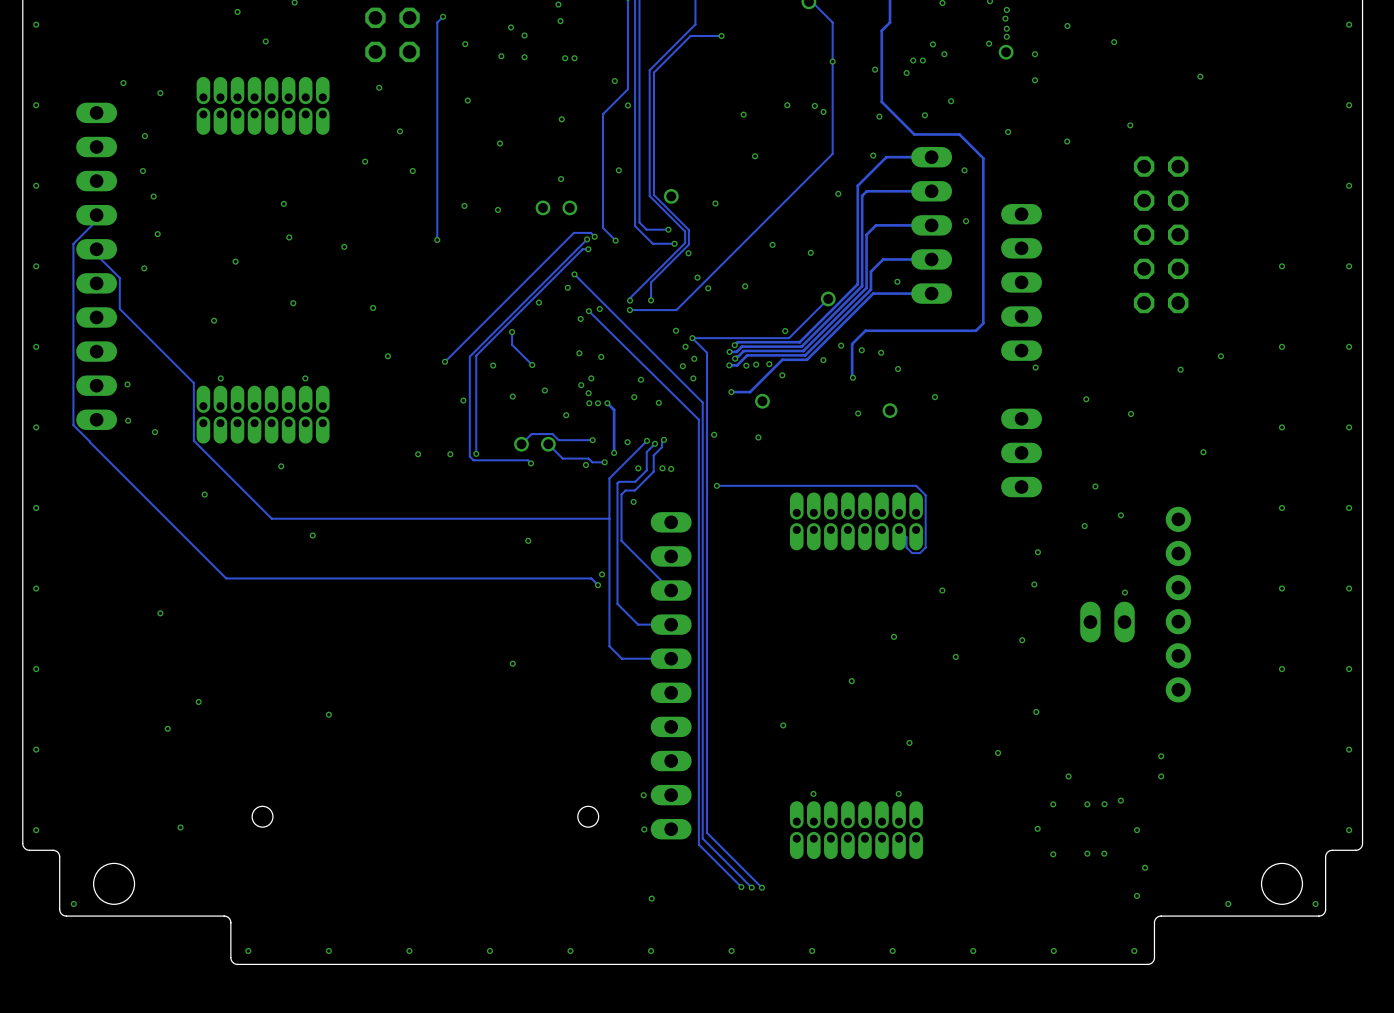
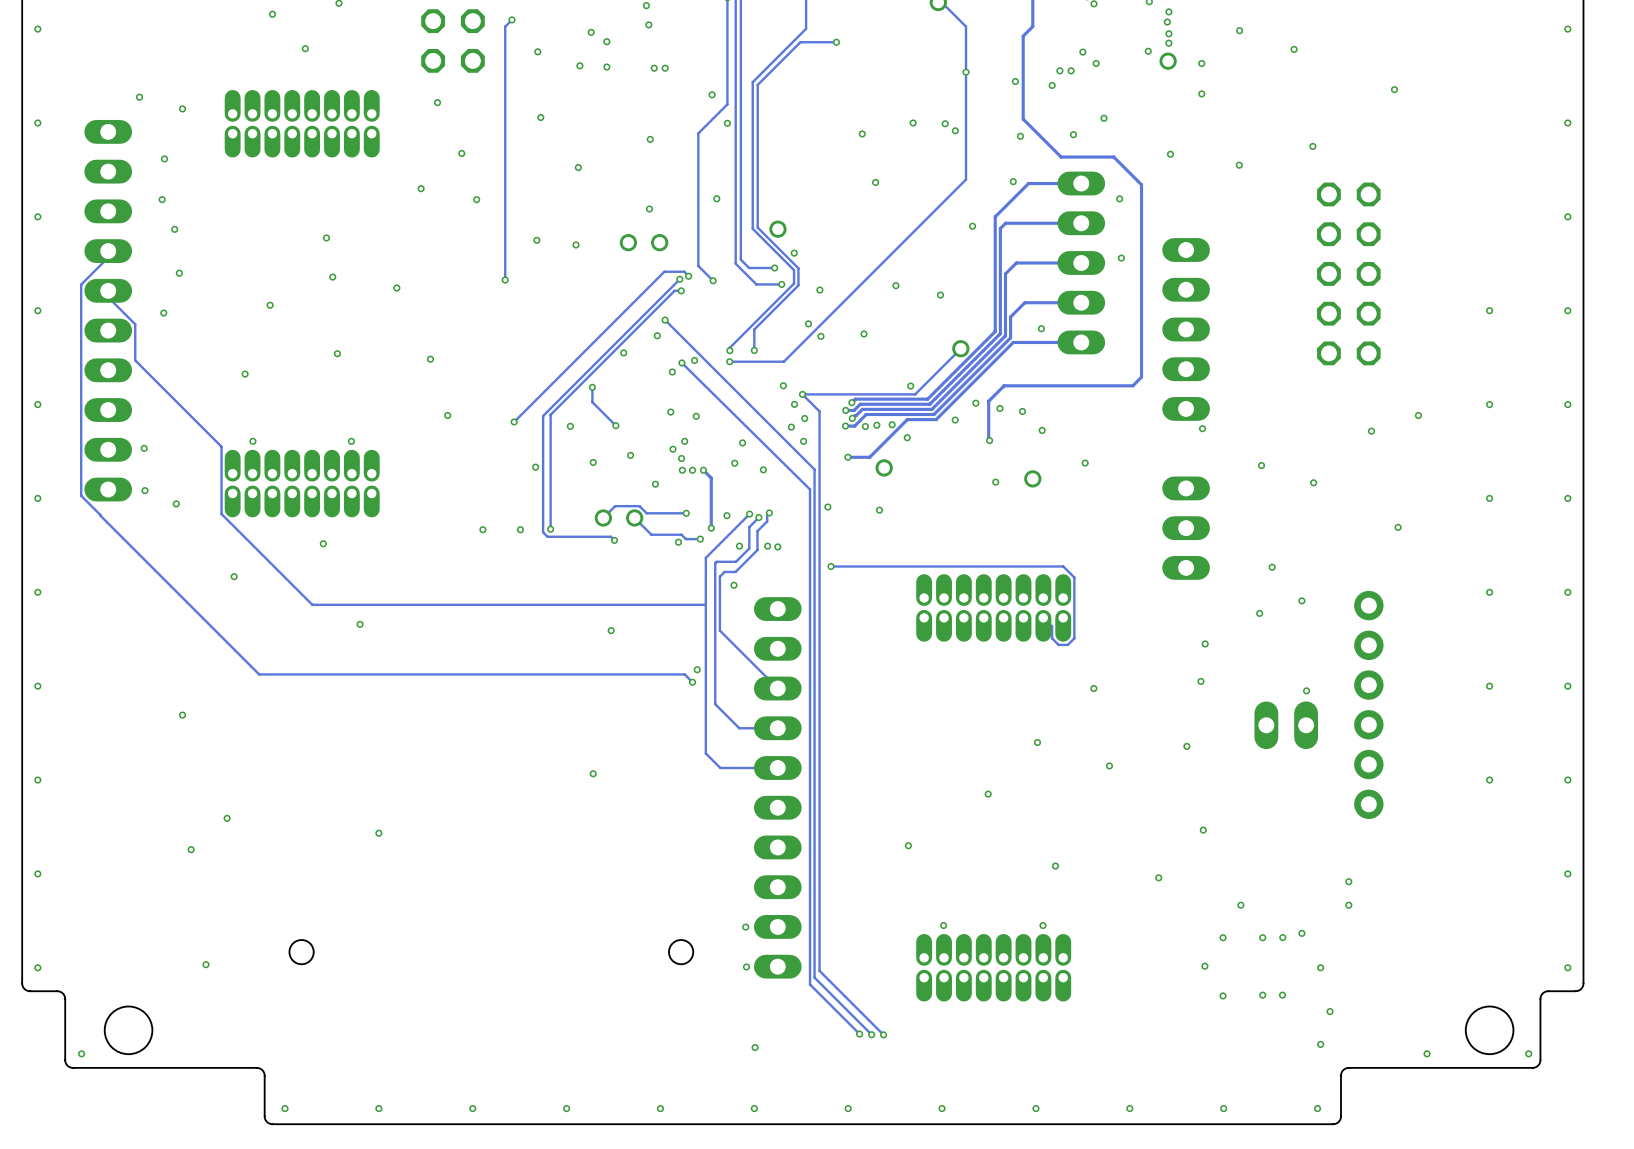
via: (715, 203) -> none
via: none -> (794, 253)
via: none -> (819, 290)
via: (688, 253) -> none

